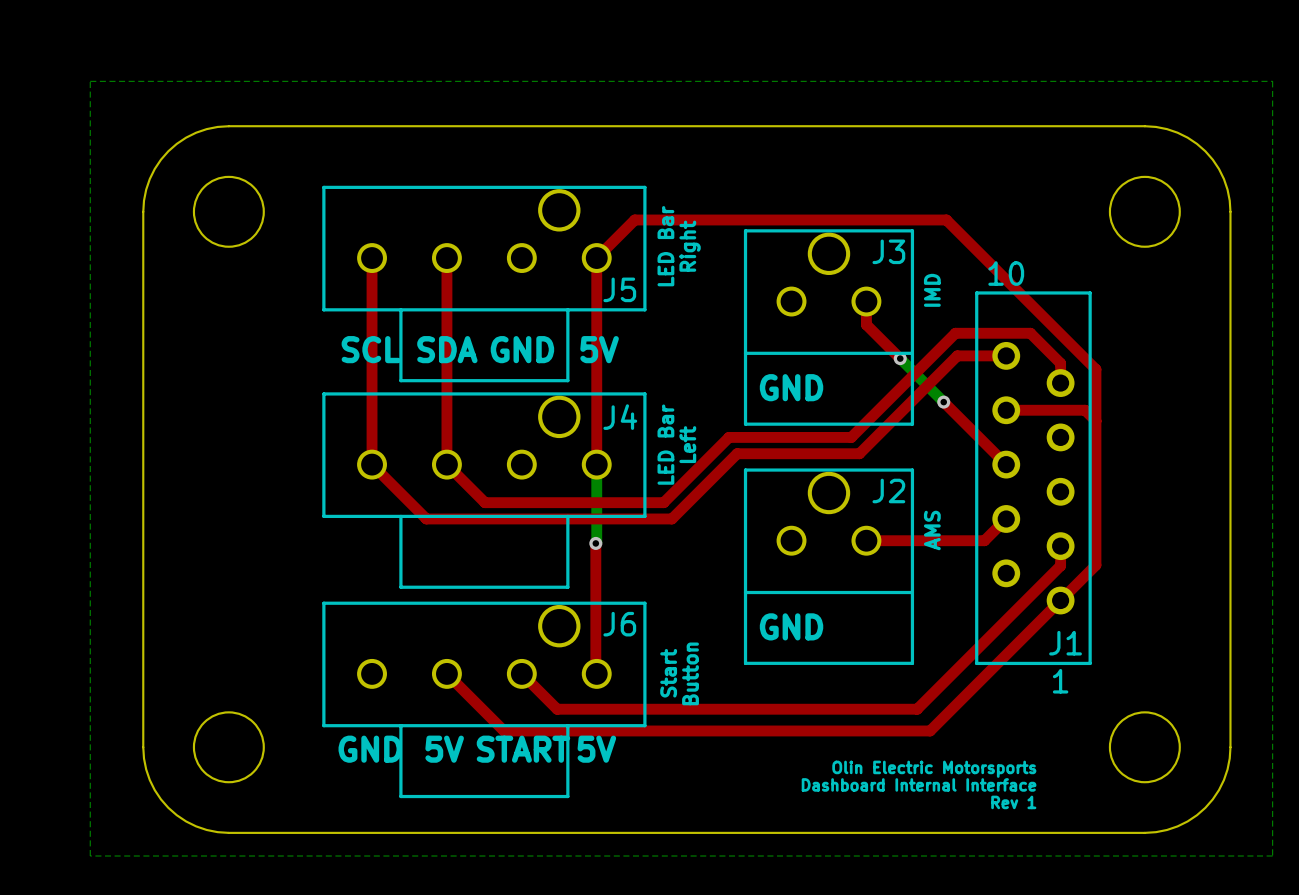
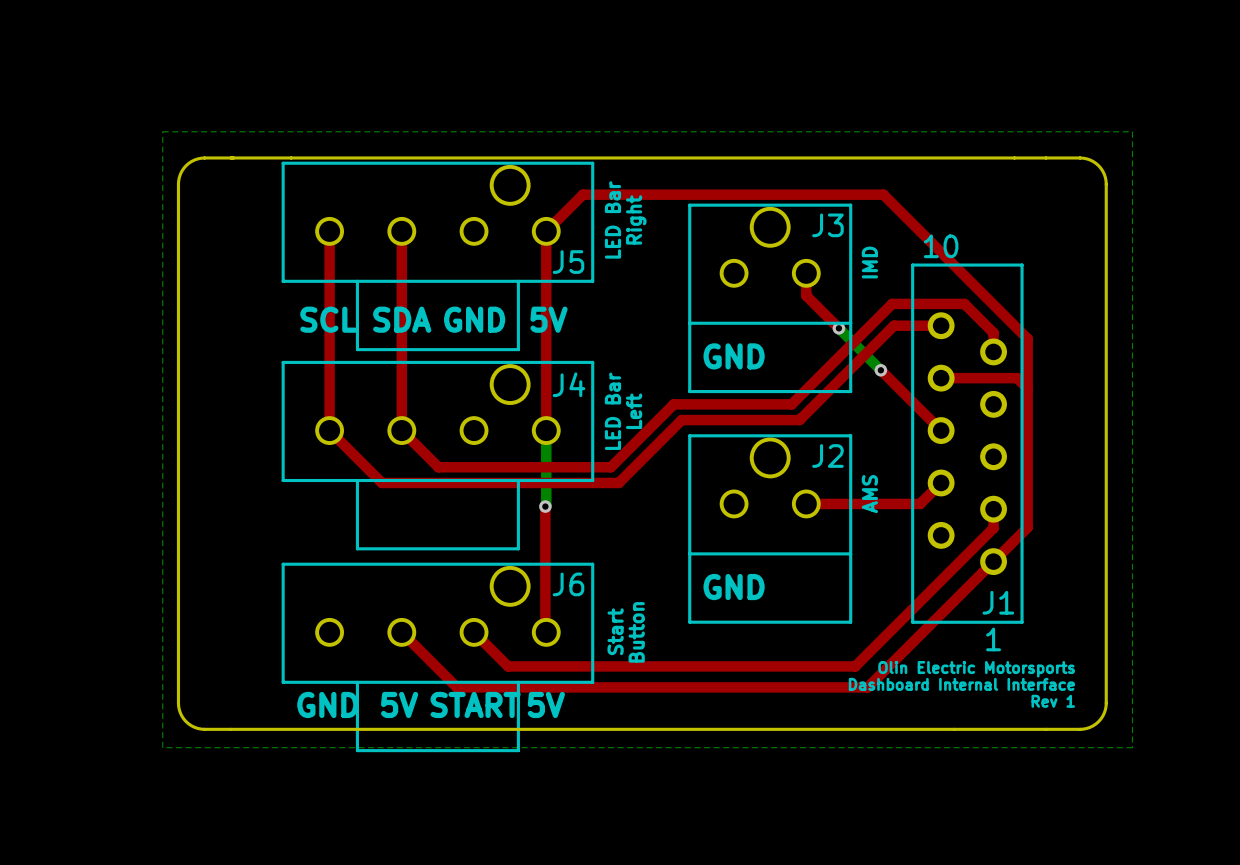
bottom zone outline: (90, 81) (1272, 81) (1272, 856) (90, 856) (90, 81) -> (162, 131) (162, 747) (1132, 747) (1132, 131) (162, 131)
board edge: (228, 126) (1144, 126) (1167, 129) (1196, 143) (1219, 169) (1227, 189) (1230, 211) (1230, 747) (1227, 769) (1212, 799) (1187, 821) (1167, 829) (1144, 832) (228, 832) (206, 829) (176, 815) (154, 790) (146, 769) (143, 747) (144, 200) (154, 169) (168, 151) (196, 132) (228, 126) -> (204, 157) (194, 159) (186, 165) (180, 174) (178, 184) (178, 703) (181, 716) (191, 725) (204, 729) (1080, 729) (1093, 725) (1102, 716) (1106, 703) (1106, 184) (1102, 171) (1093, 161) (1080, 157) (204, 157)
round board edge: [192, 175, 265, 248] -> none
round board edge: [1108, 175, 1181, 248] -> none
round board edge: [192, 711, 265, 784] -> none
round board edge: [1108, 711, 1181, 784] -> none
text position: Olin Electric Motorsports (934, 769) -> Olin Electric Motorsports (976, 669)
text position: Dashboard Internal Interface (919, 784) -> Dashboard Internal Interface (961, 684)
text position: Rev 1 (1013, 802) -> Rev 1 (1053, 701)

